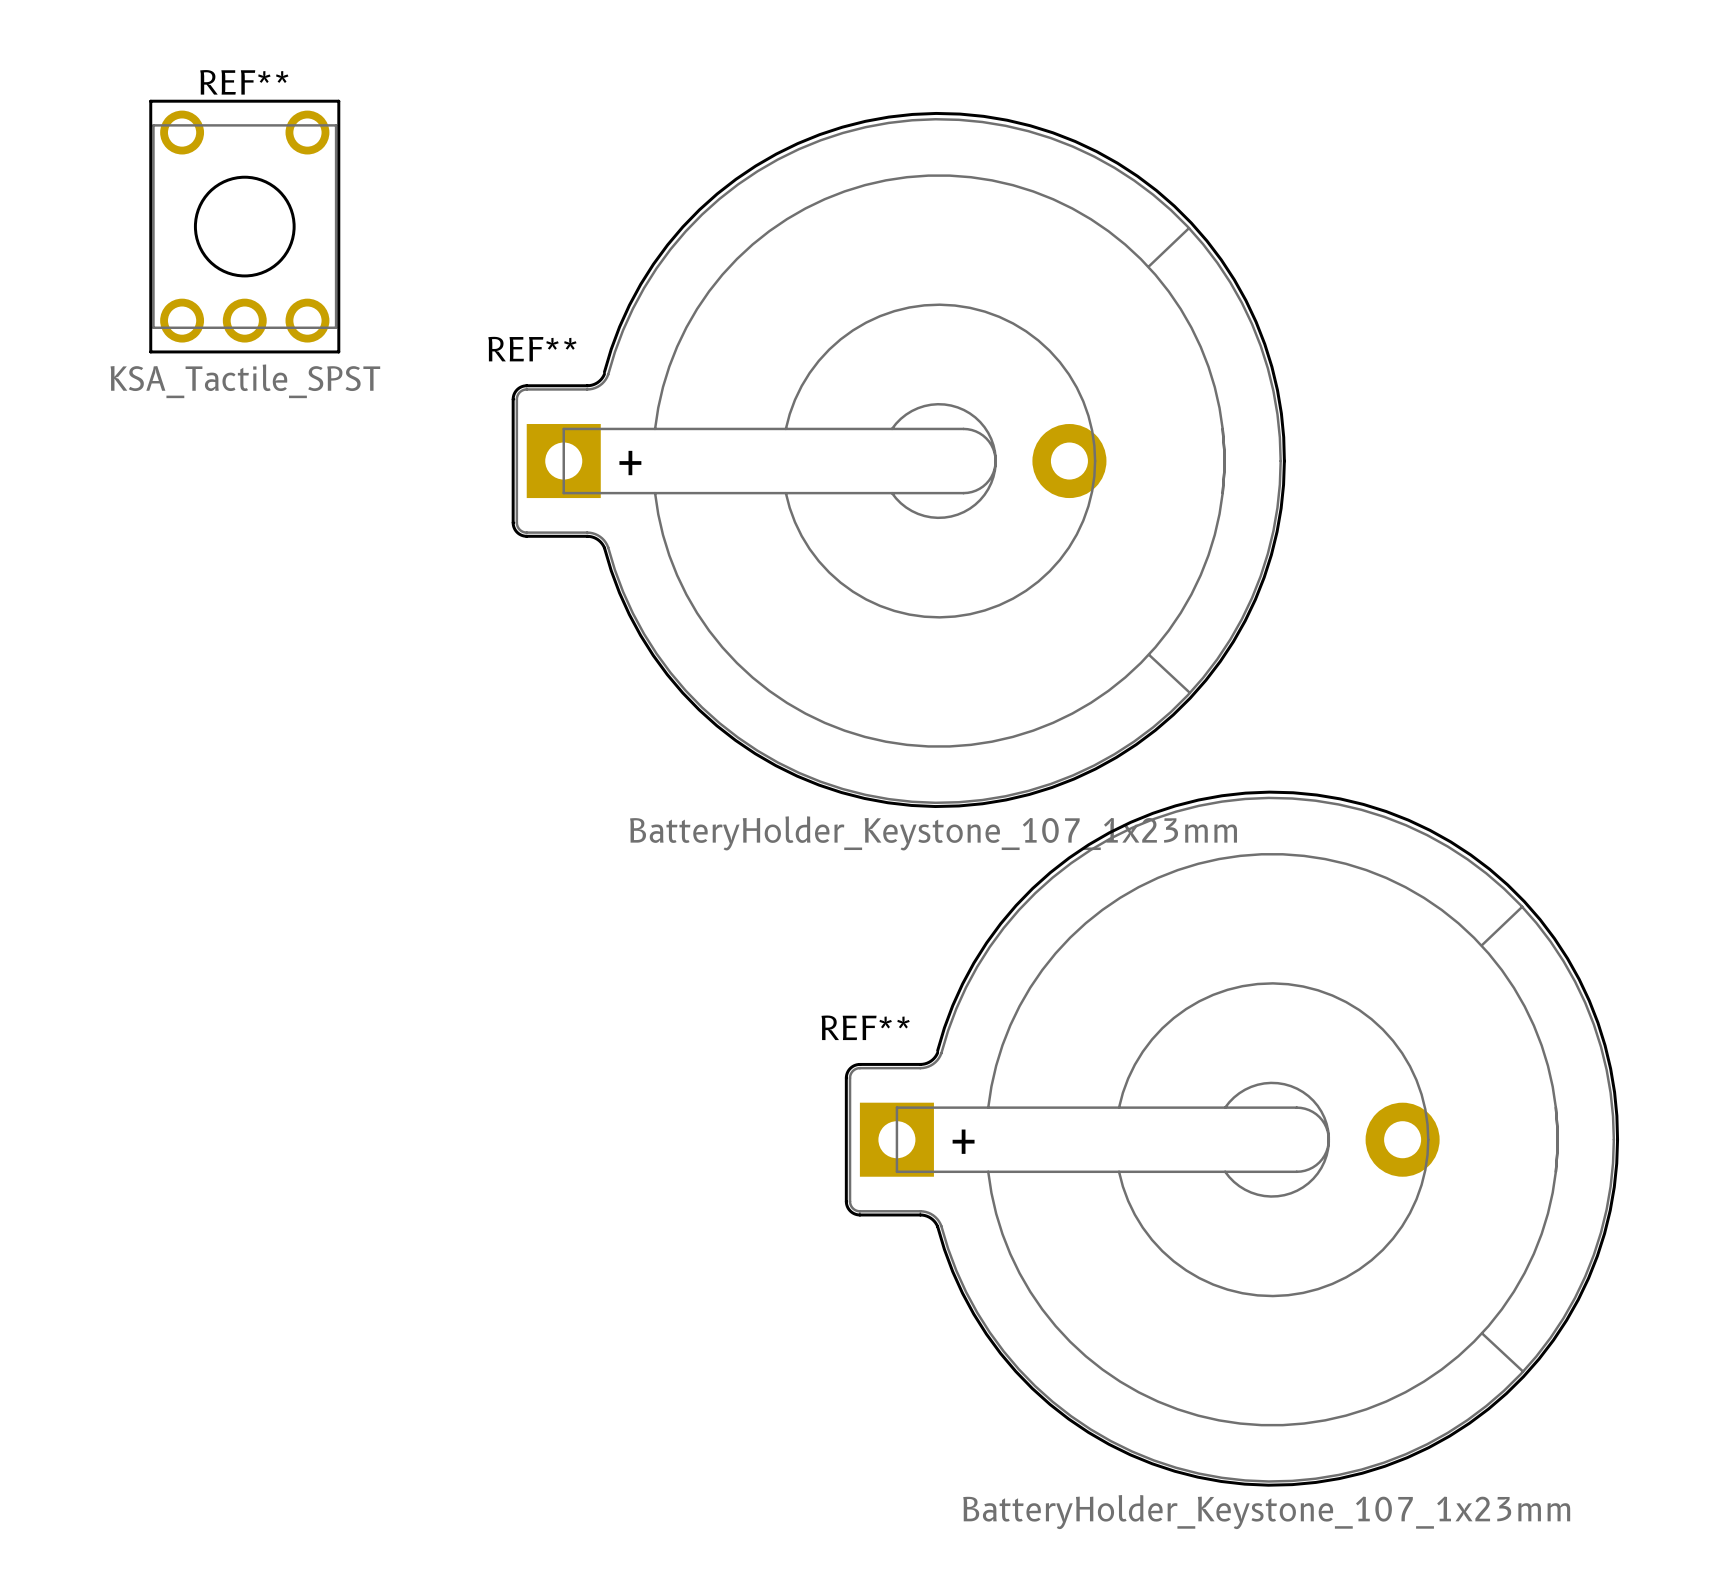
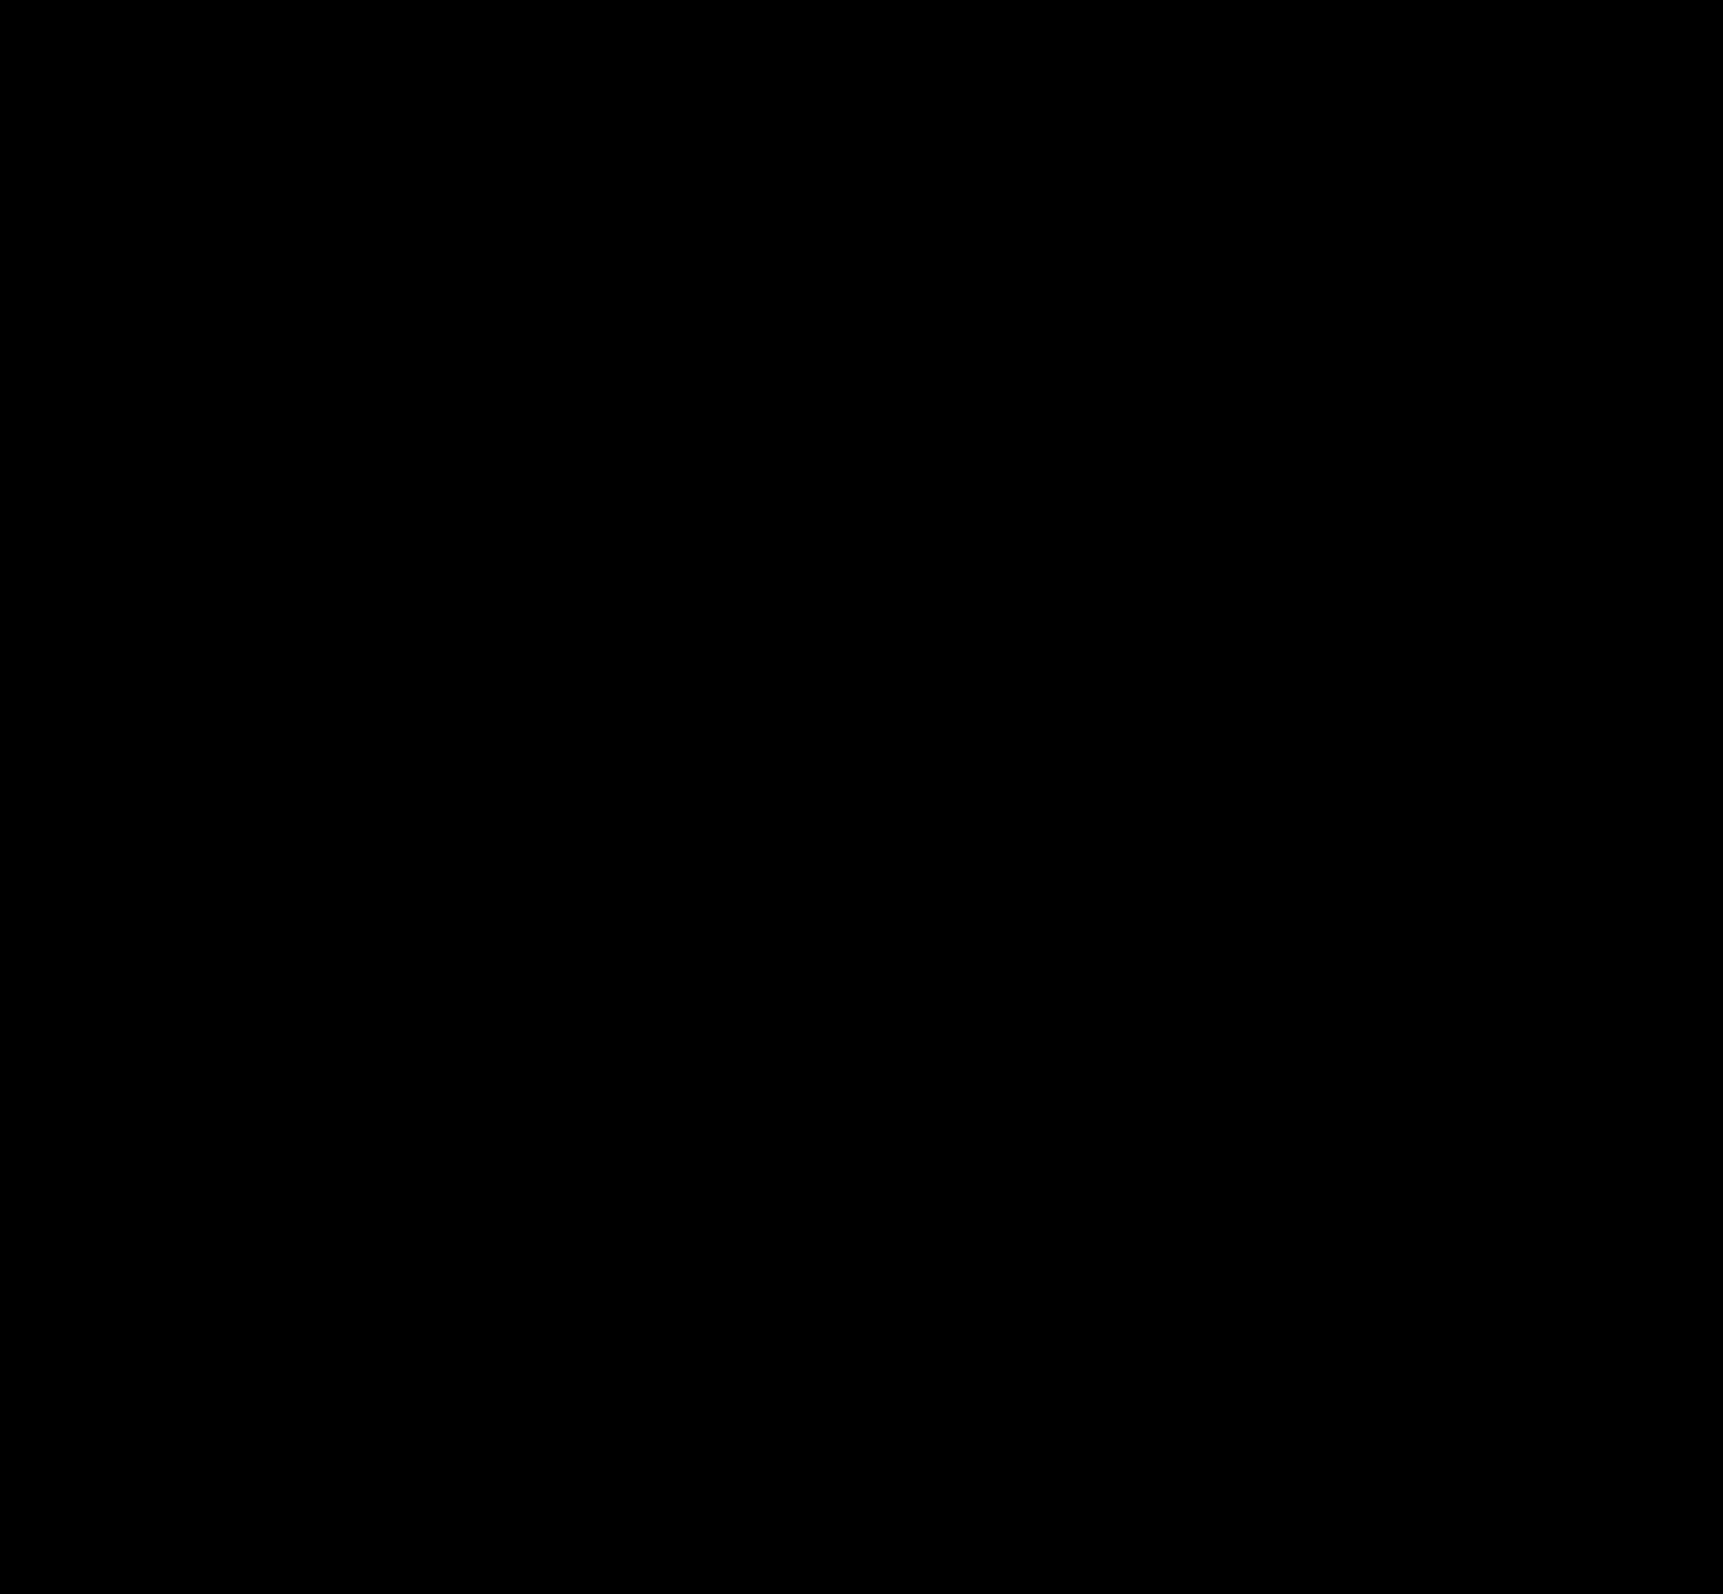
REF**: KSA_Tactile_SPST (244, 226) -> none
REF**: BatteryHolder_Keystone_107_1x23mm (898, 459) -> none
REF**: BatteryHolder_Keystone_107_1x23mm (1231, 1138) -> none

